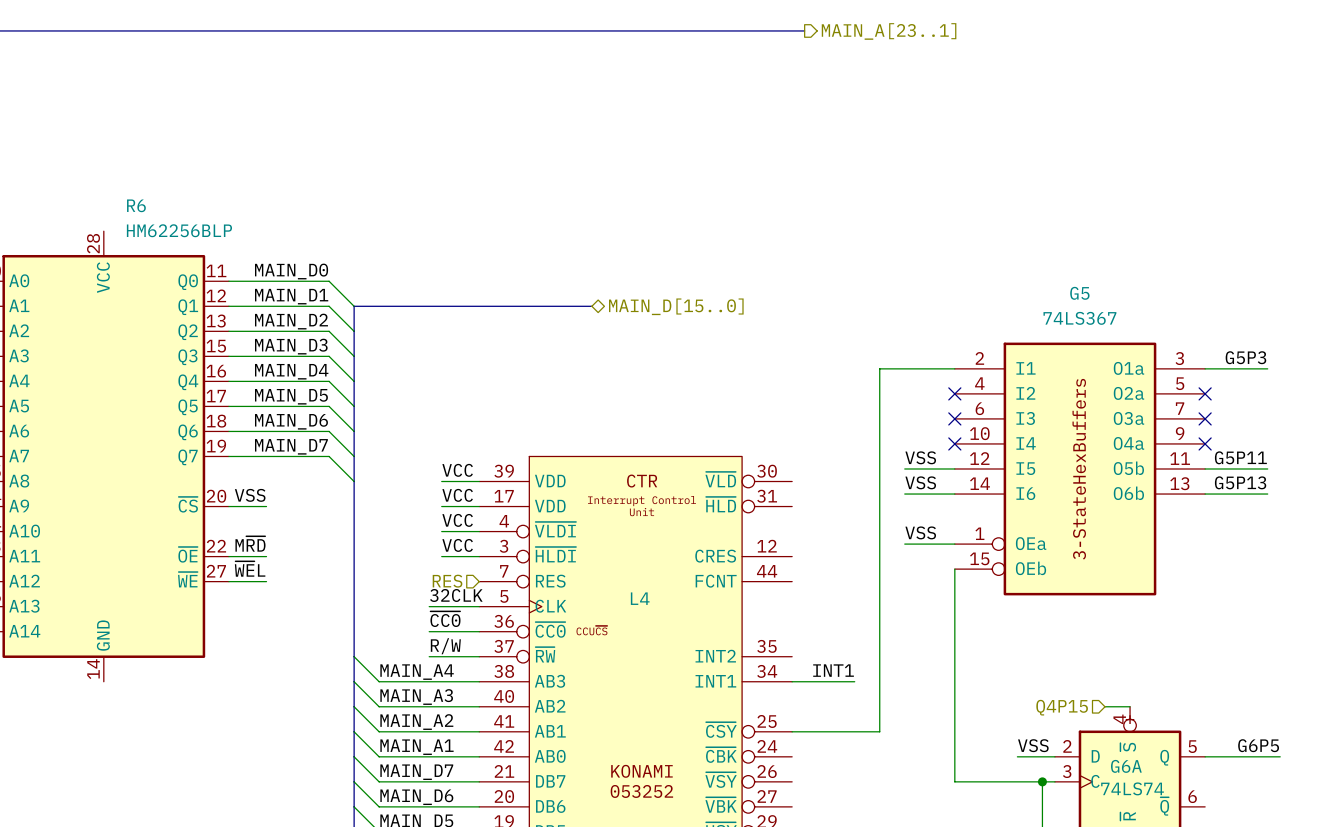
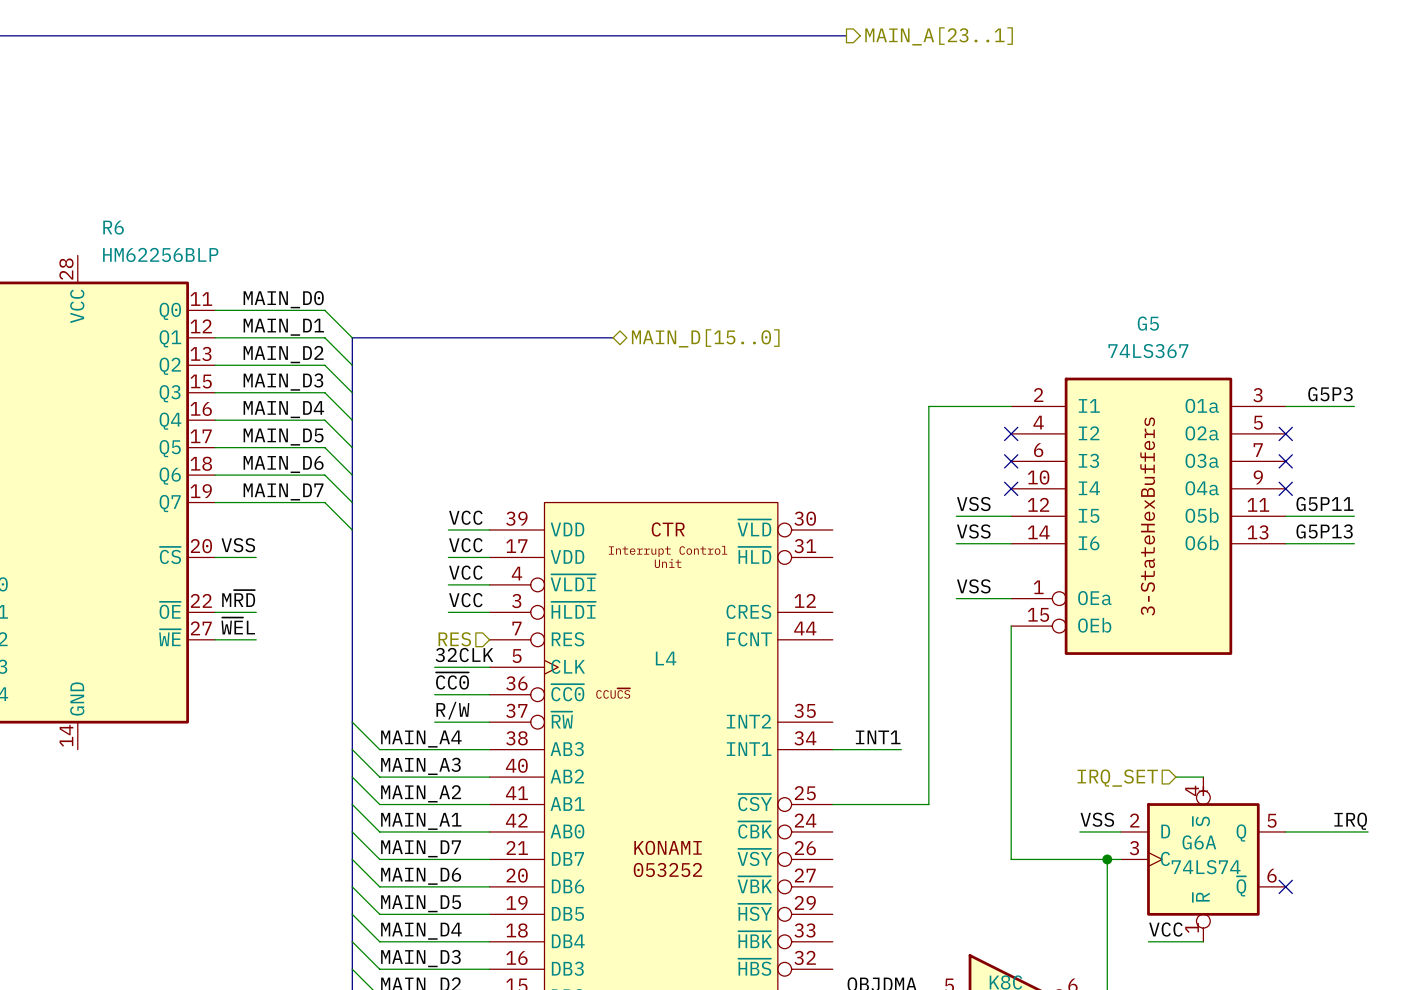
hierarchical label: Q4P15 (1062, 707) -> IRQ_SET (1117, 778)
label: G6P5 (1258, 745) -> IRQ (1350, 821)
no-connect mark: none -> (1285, 886)

